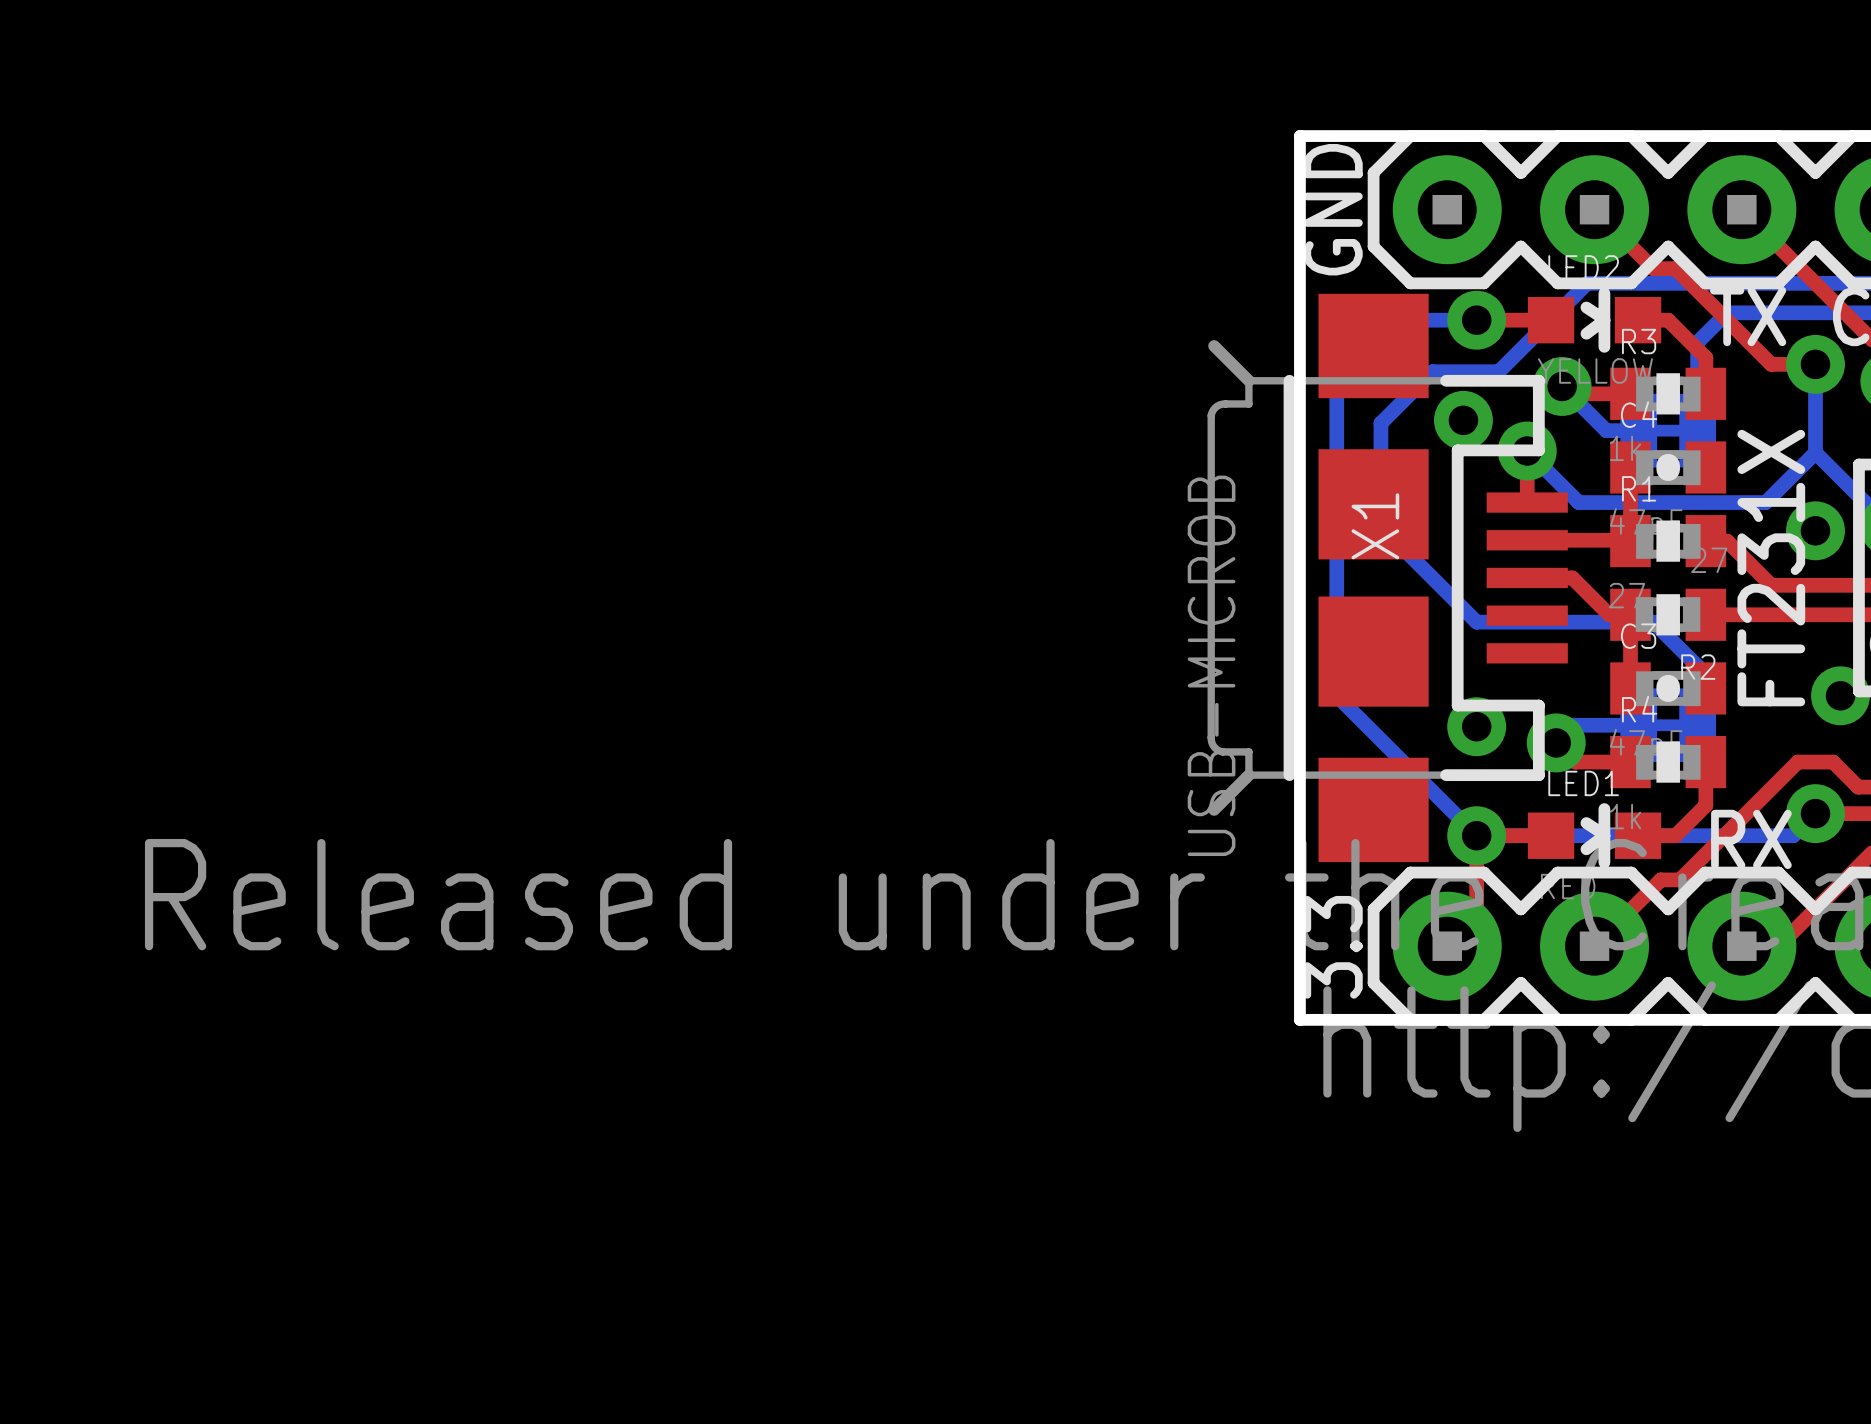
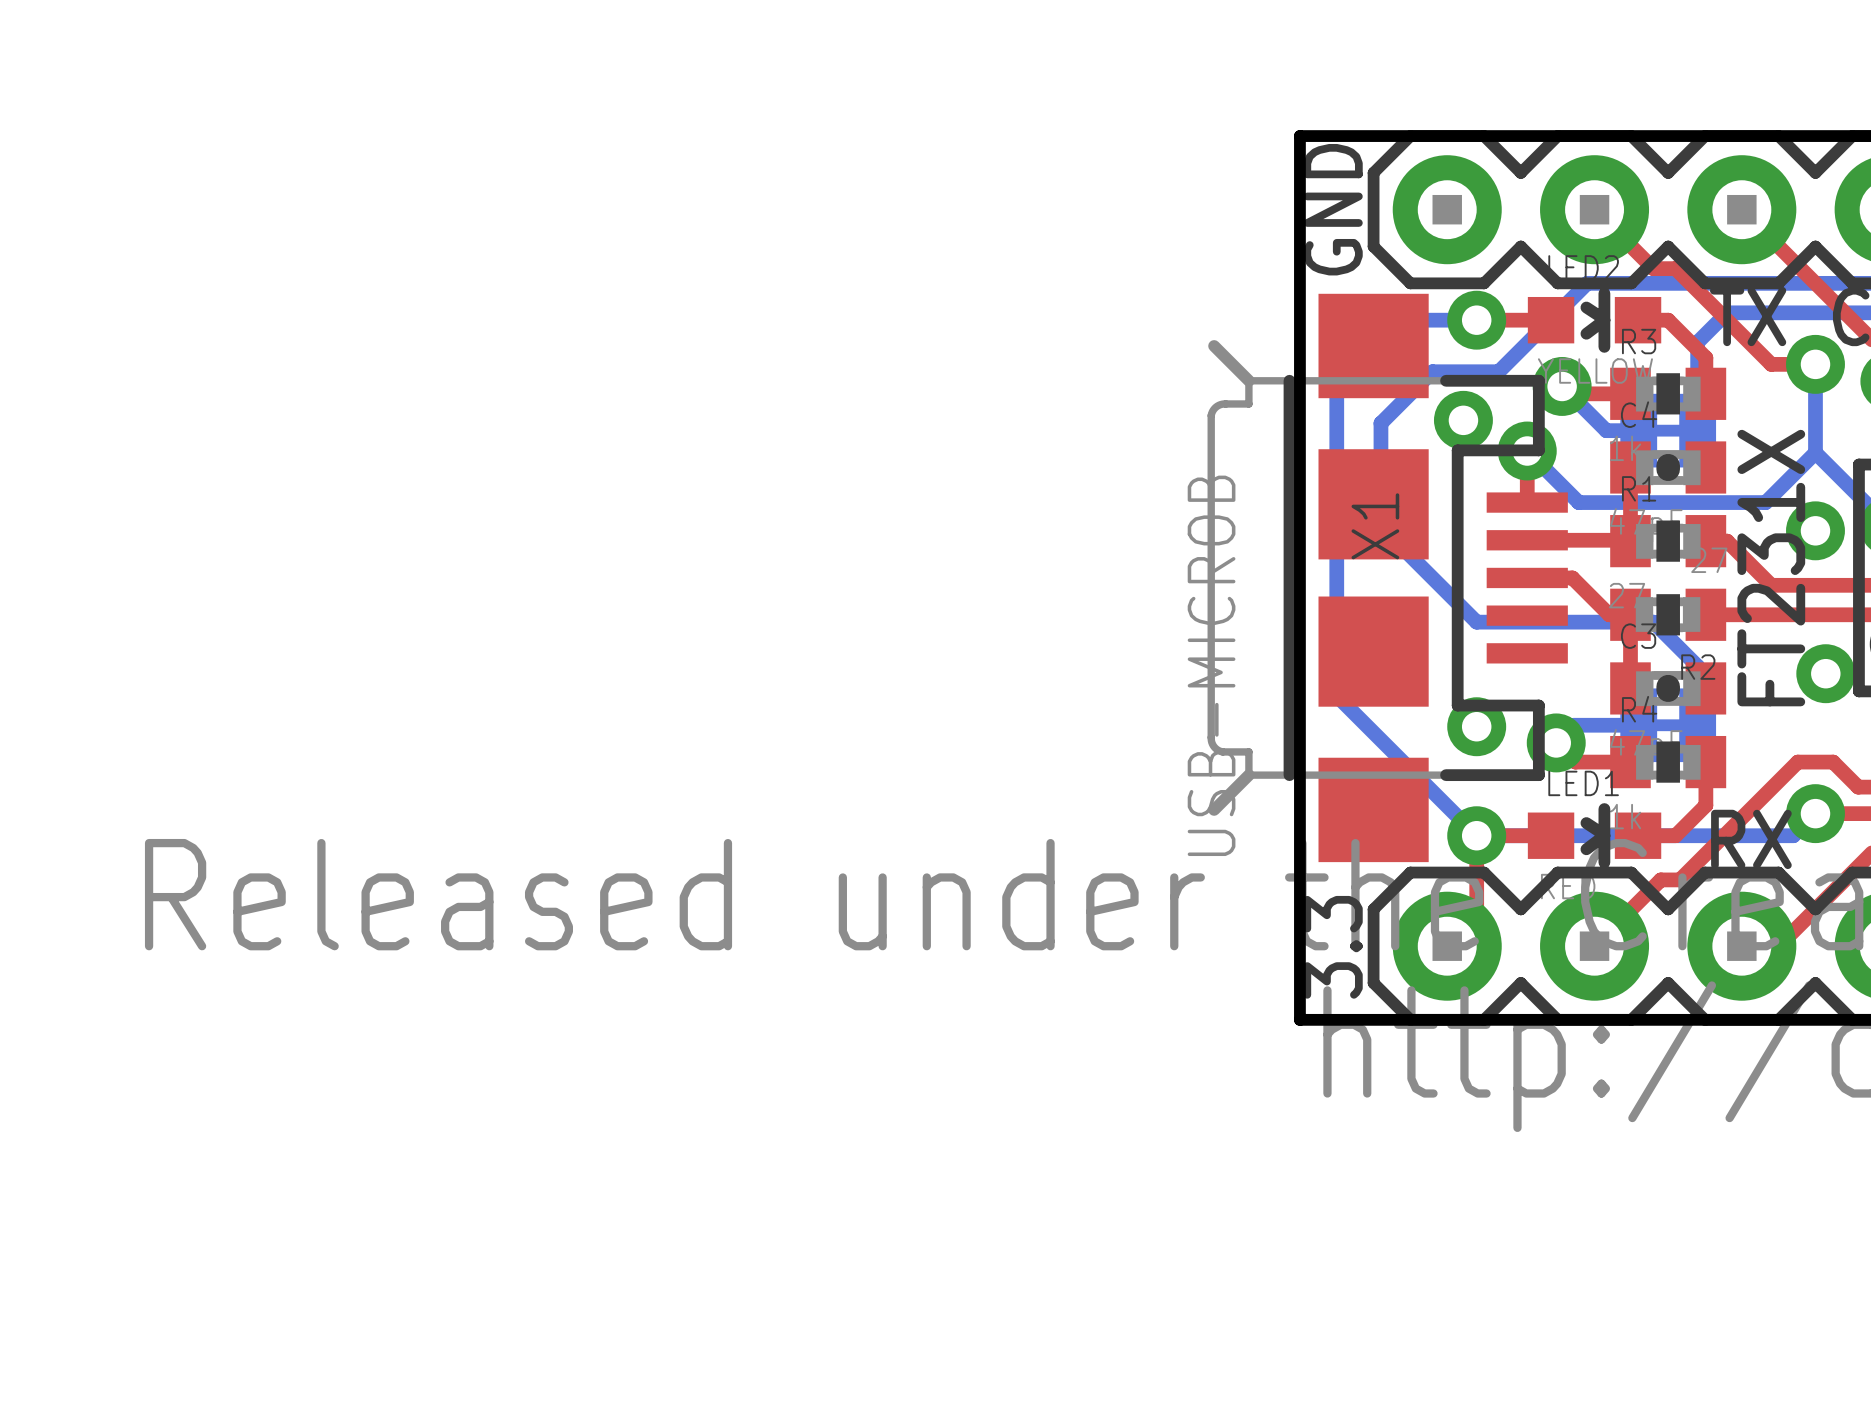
via position: (1840, 695) -> (1825, 673)

